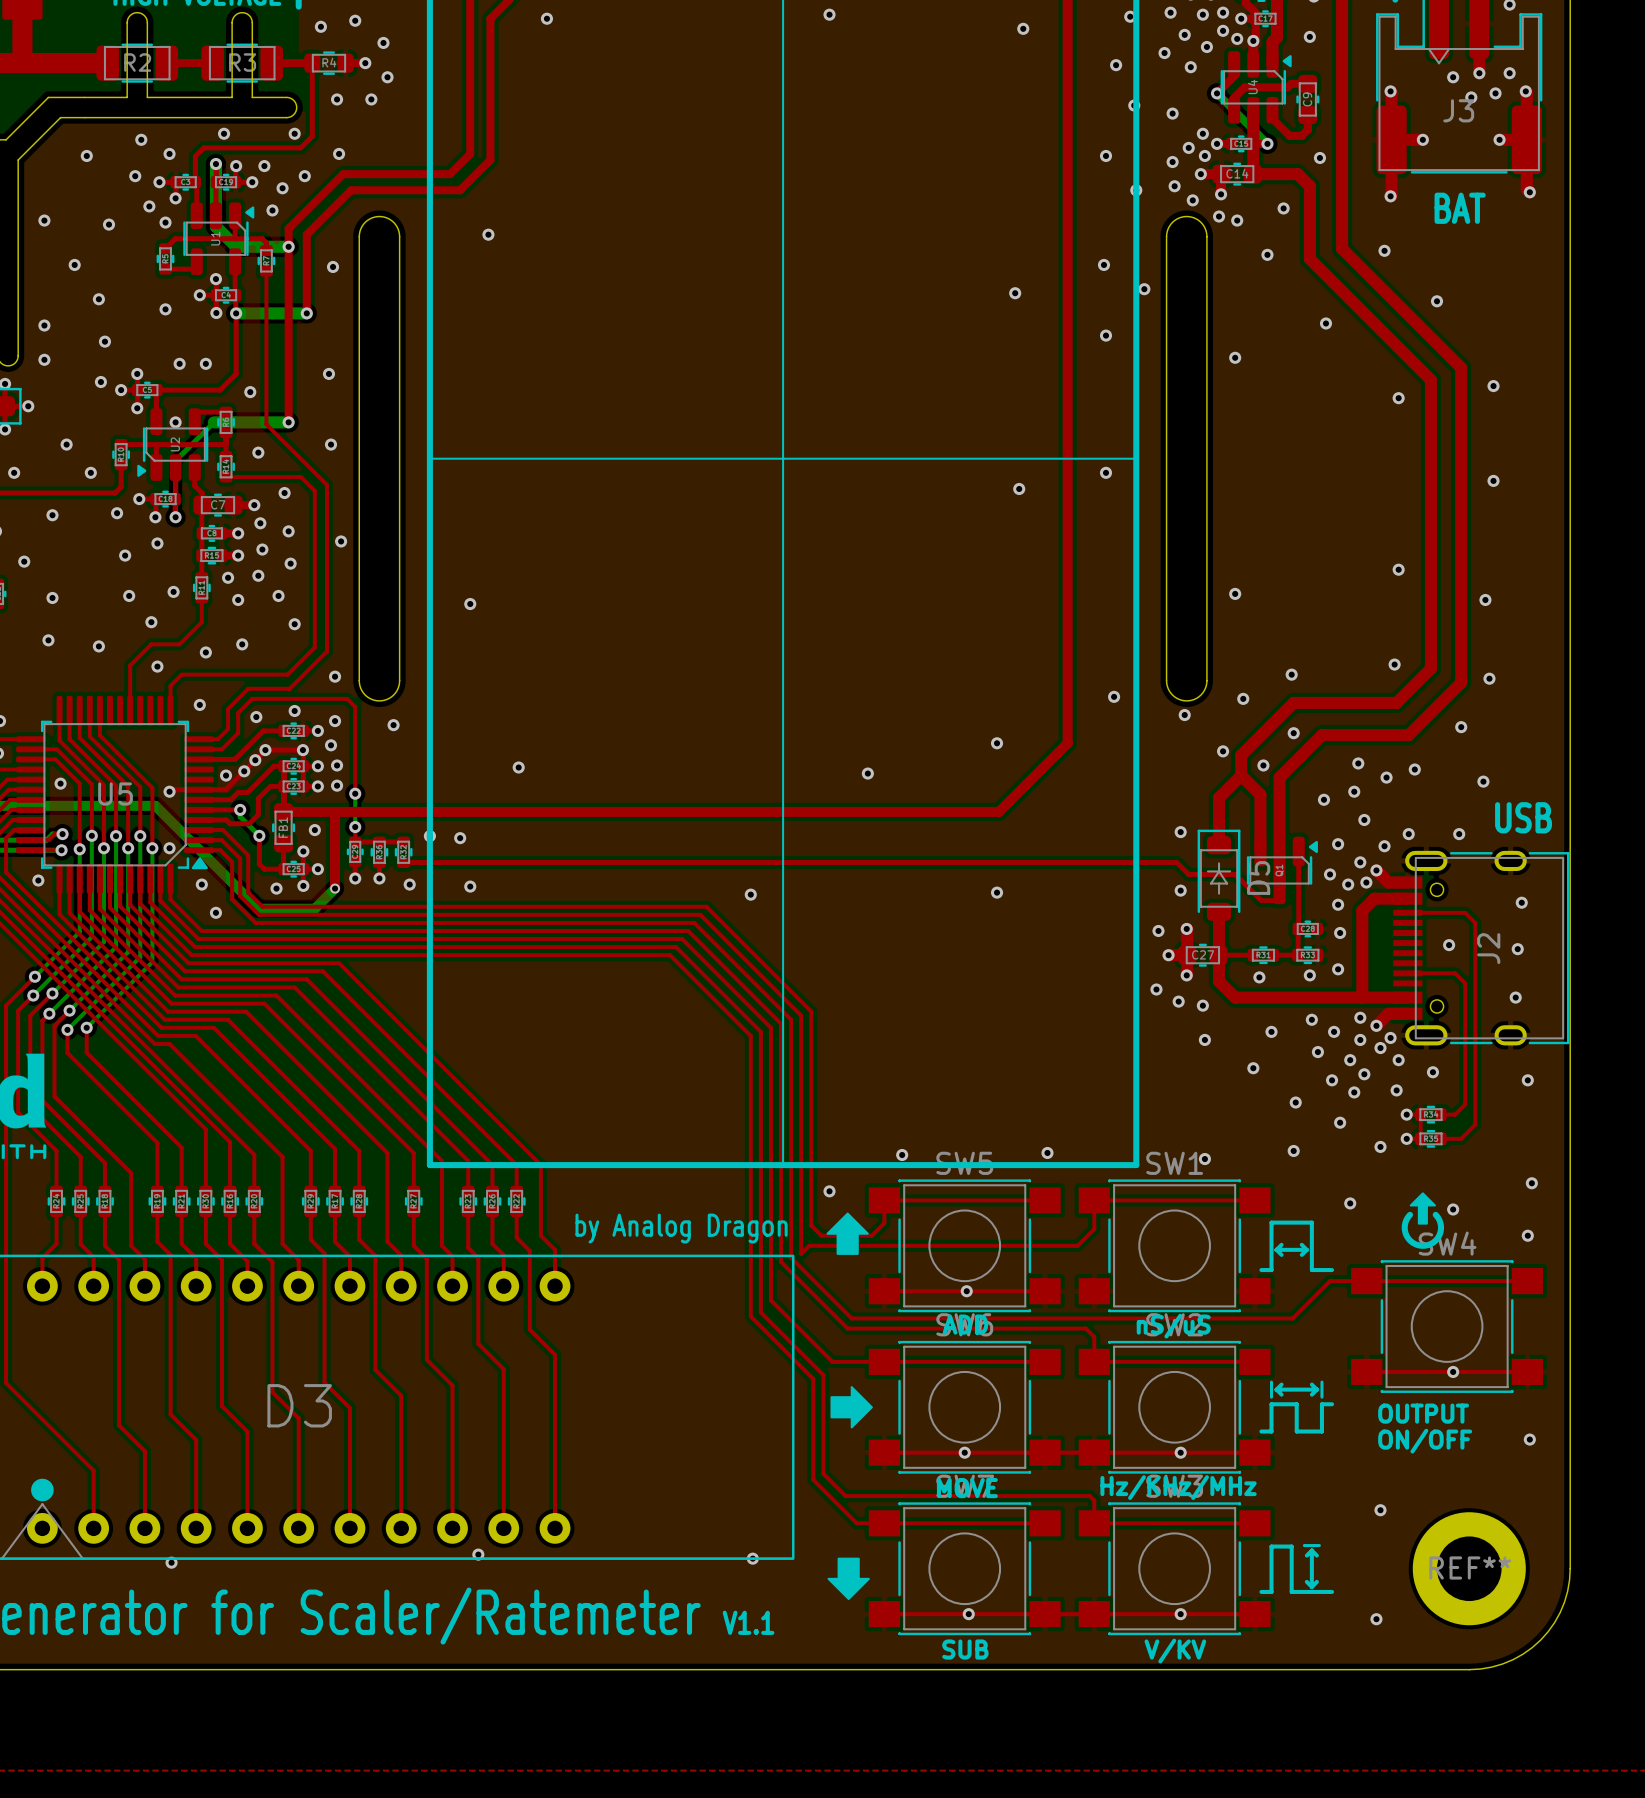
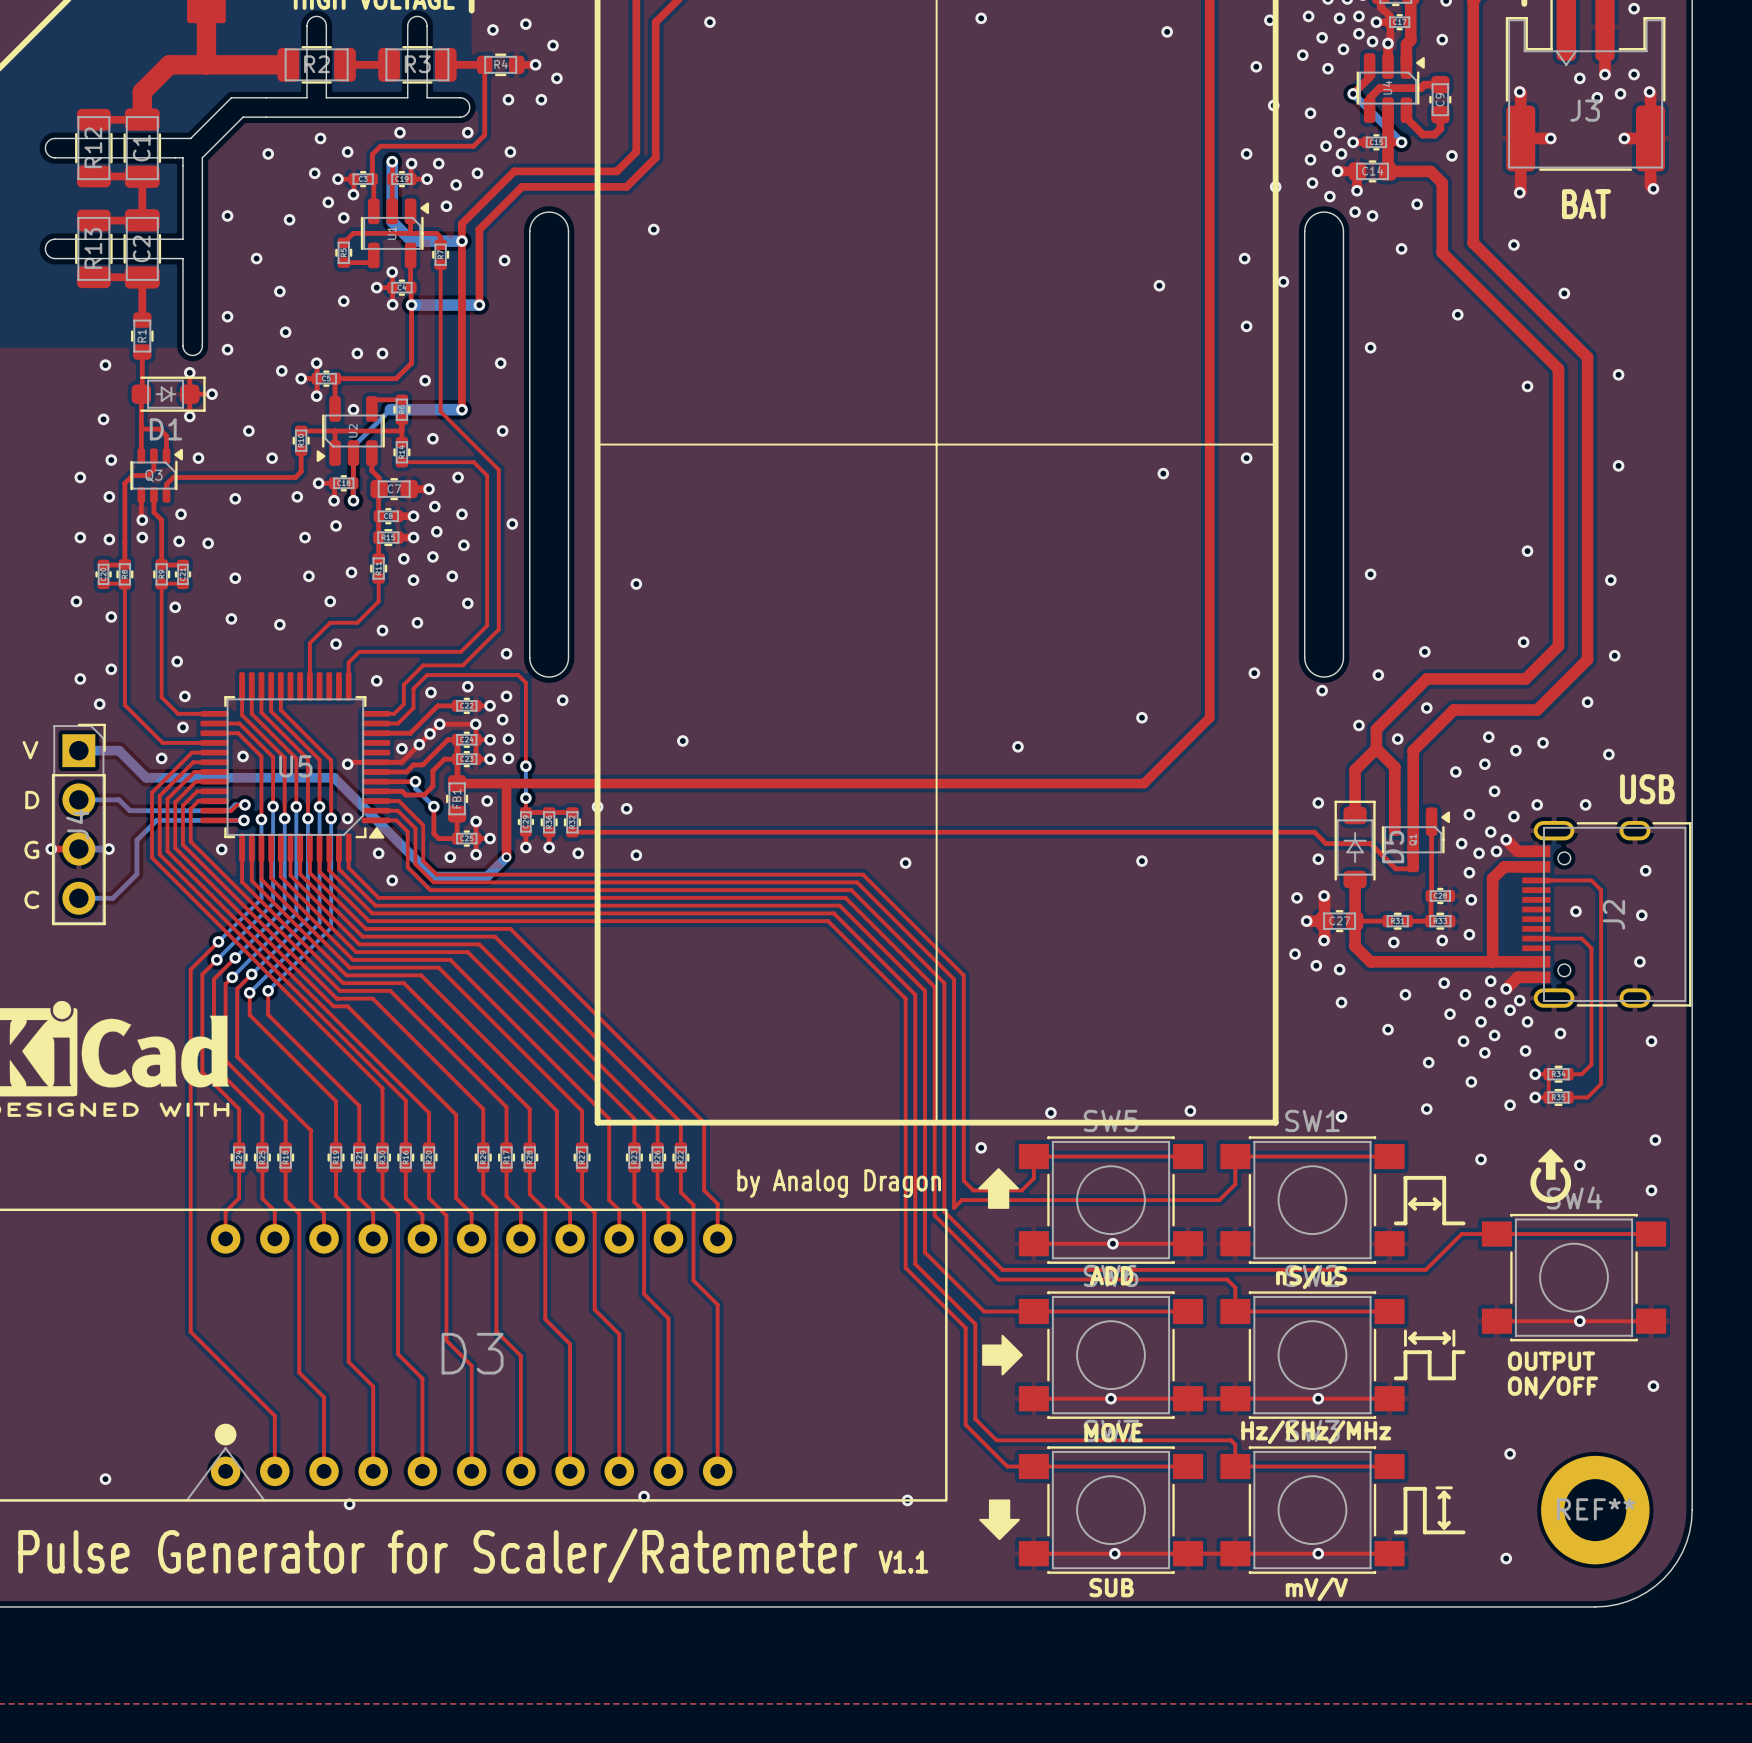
text: V/KV (1175, 1651) -> mV/V (1316, 1589)

